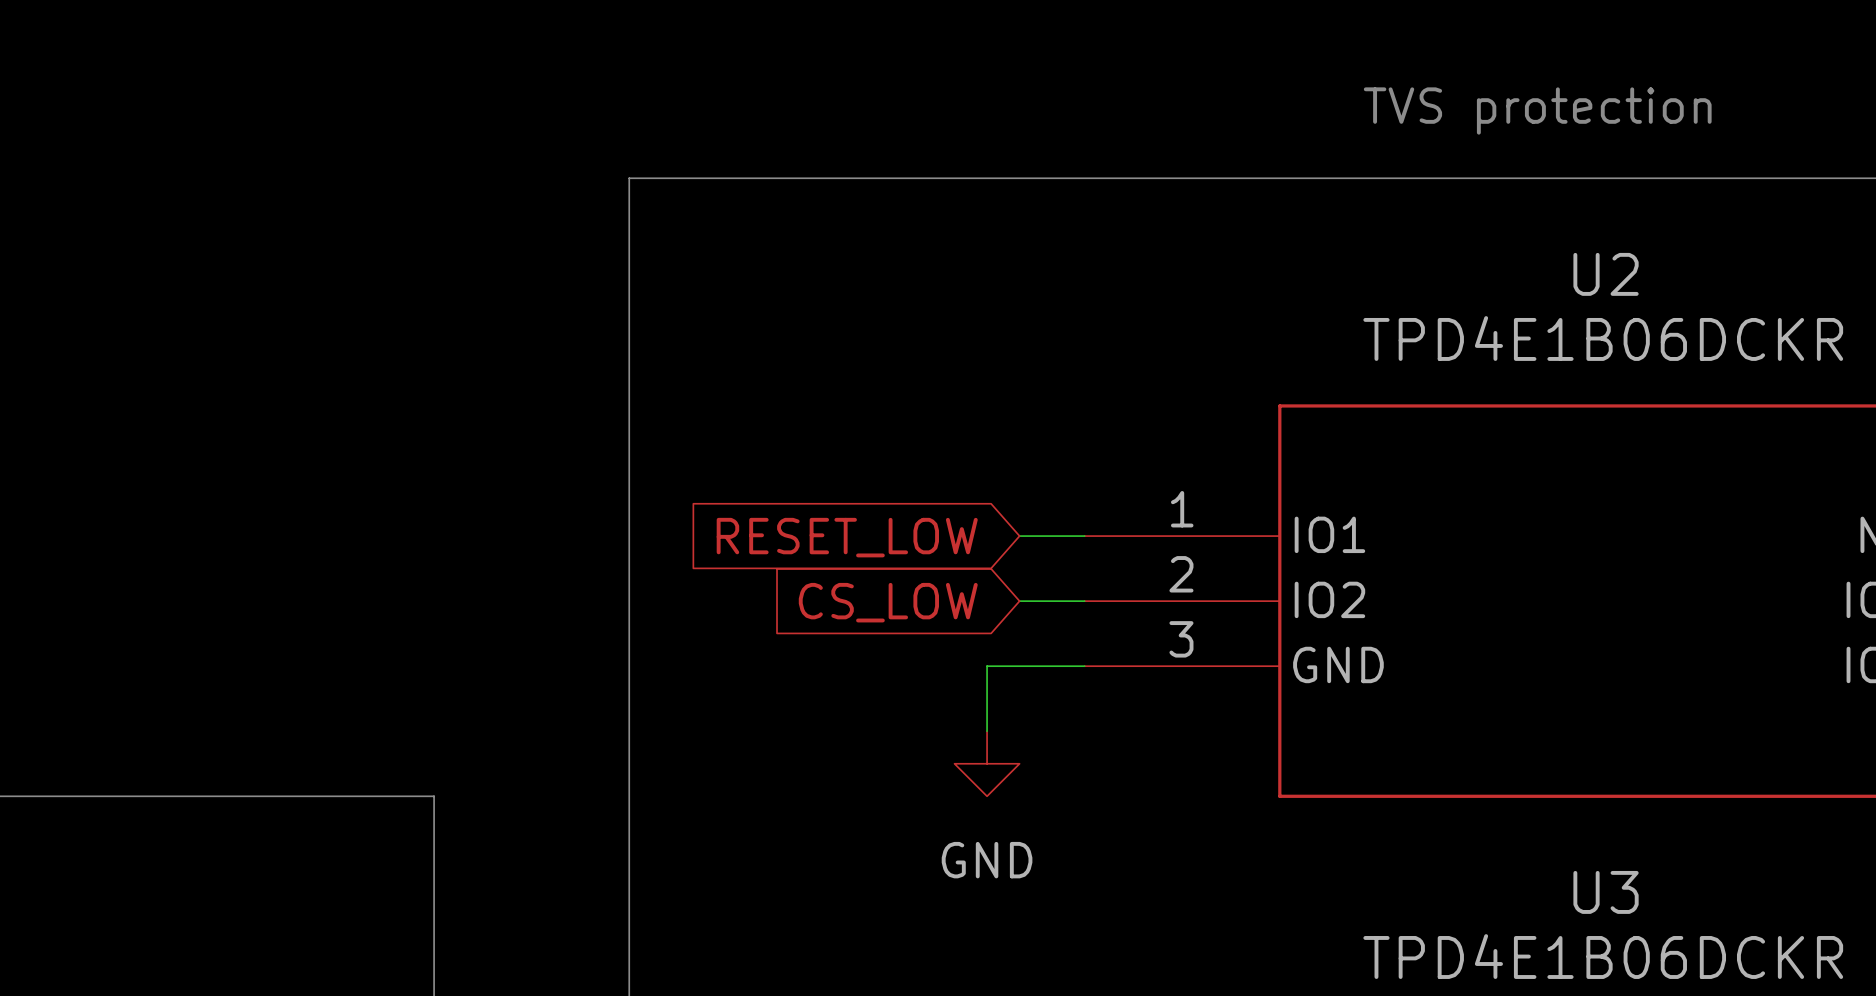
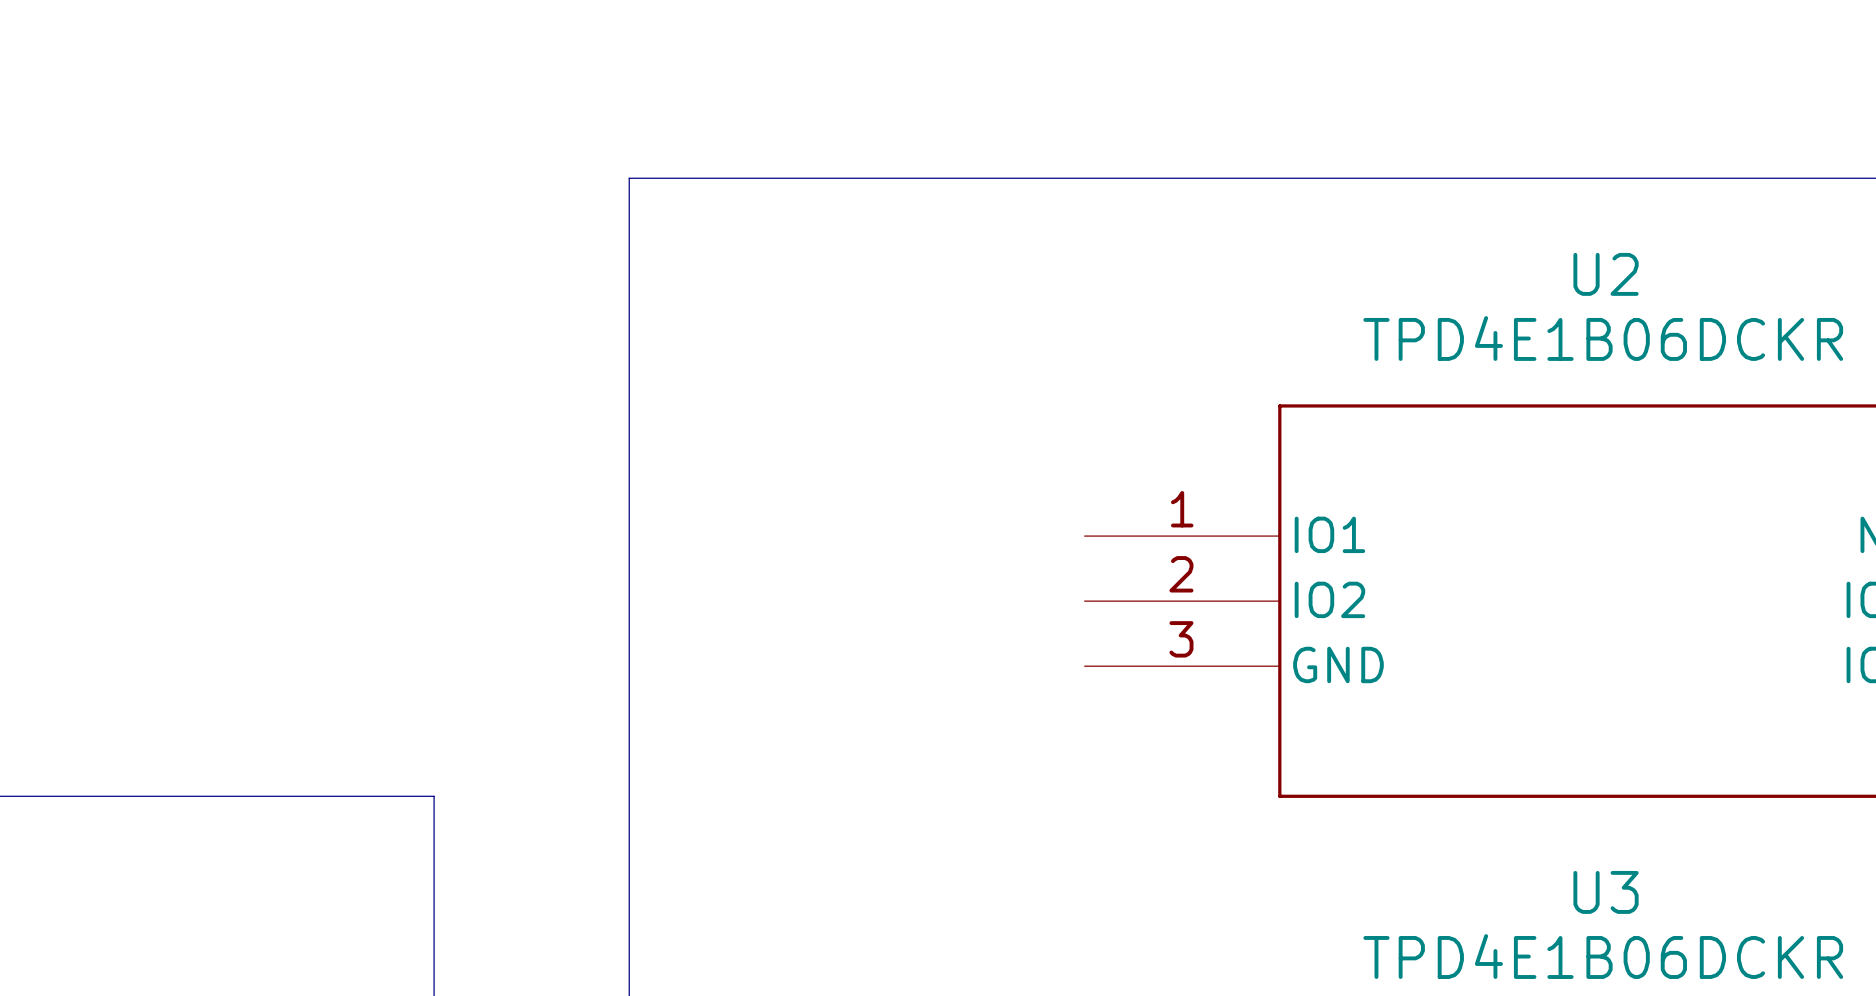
text: TVS protection (1537, 111) -> none
wire: (1019, 536) (1084, 536) -> none
global label: RESET_LOW (847, 537) -> none
wire: (1019, 601) (1084, 601) -> none
global label: CS_LOW (888, 602) -> none
wire: (1084, 666) (987, 666) (987, 731) -> none
power symbol: GND (987, 763) -> none

